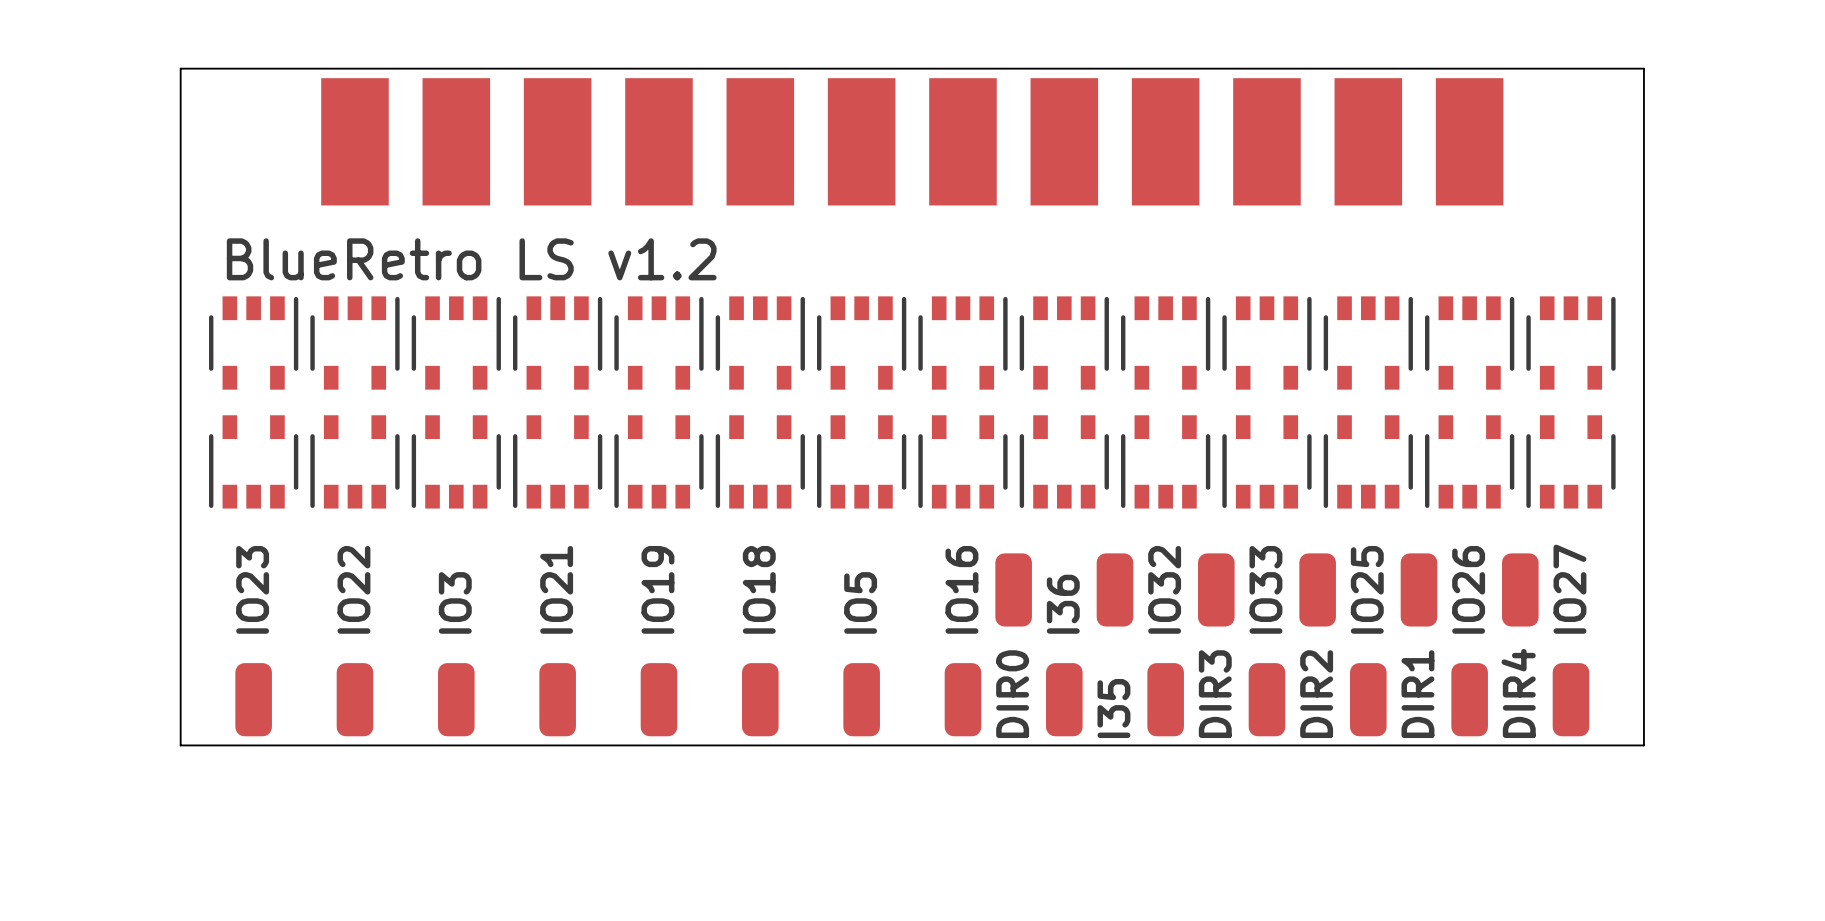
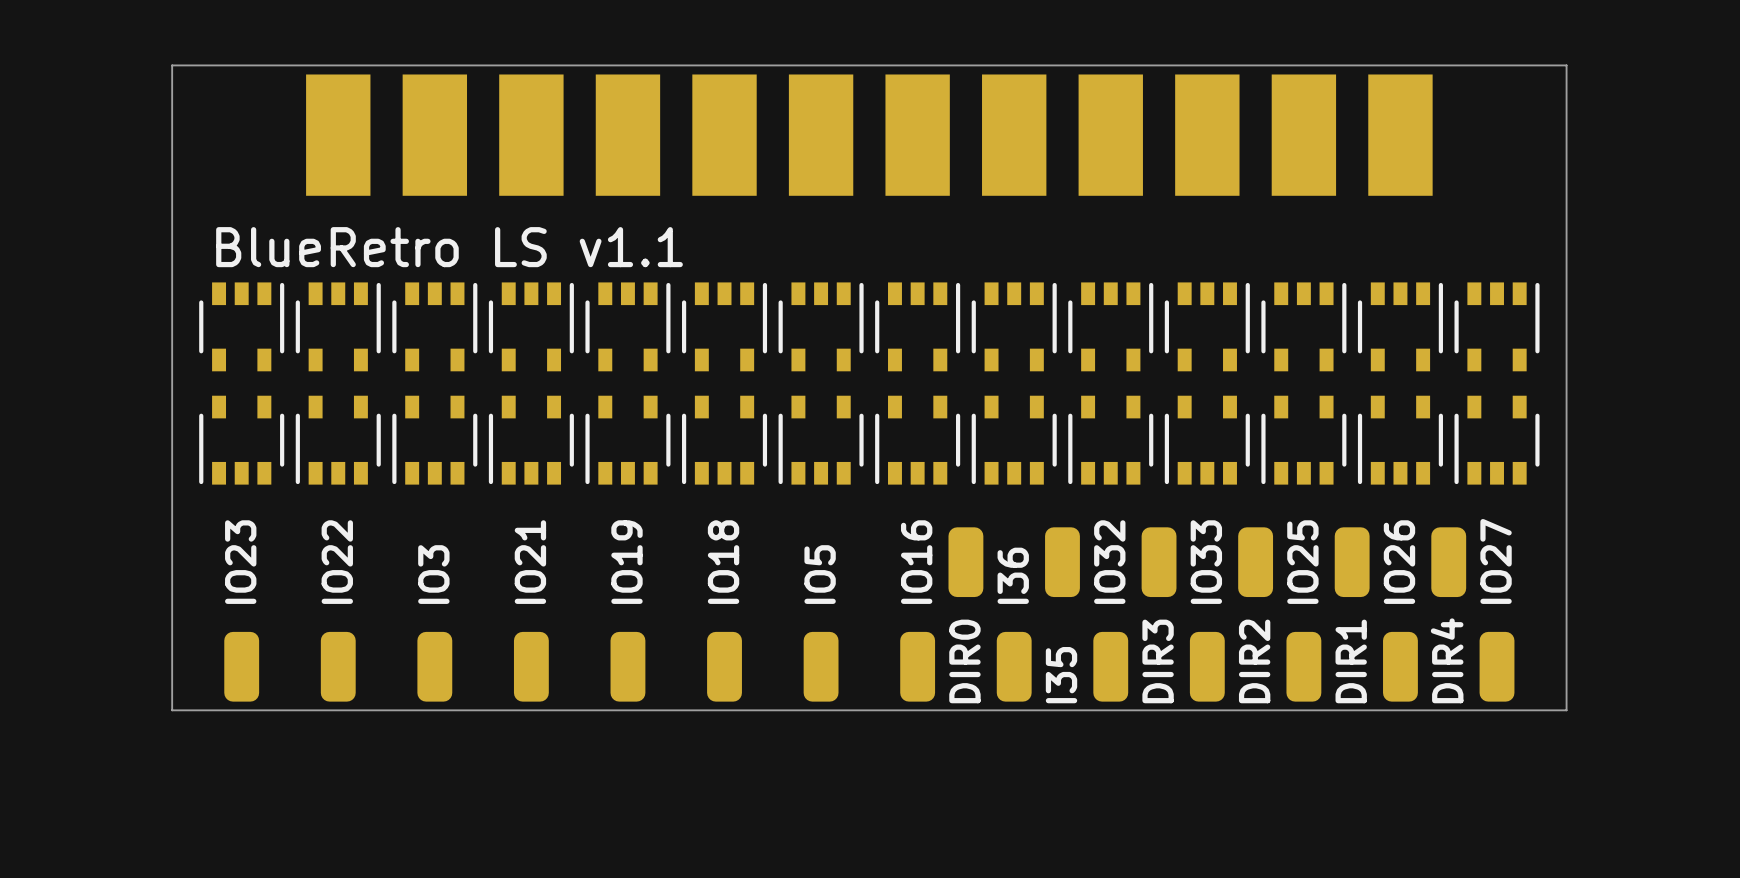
text: BlueRetro LS v1.2 (471, 259) -> BlueRetro LS v1.1 (449, 247)

